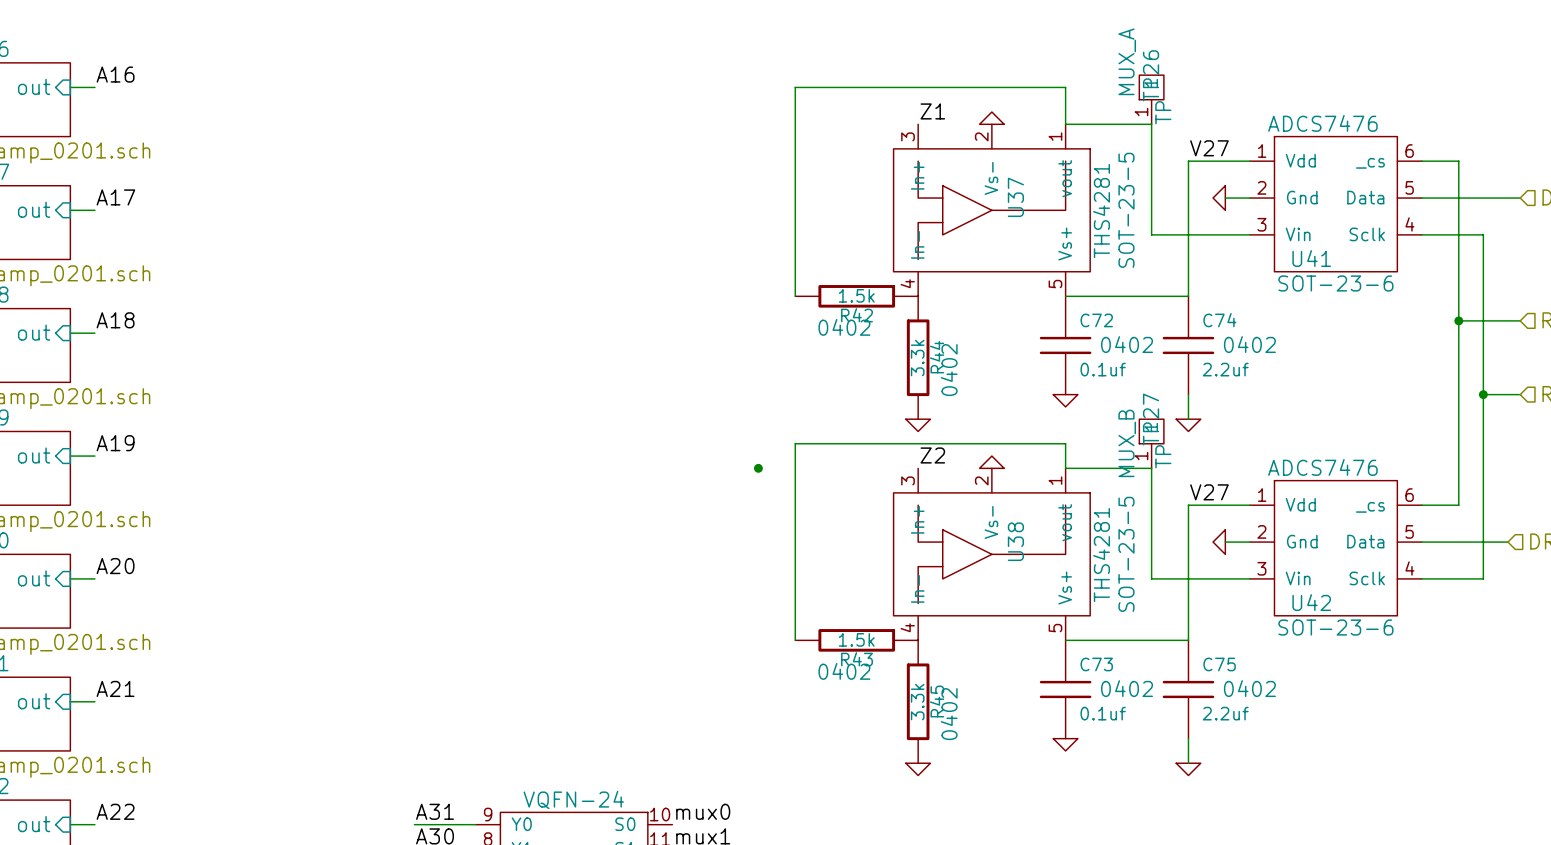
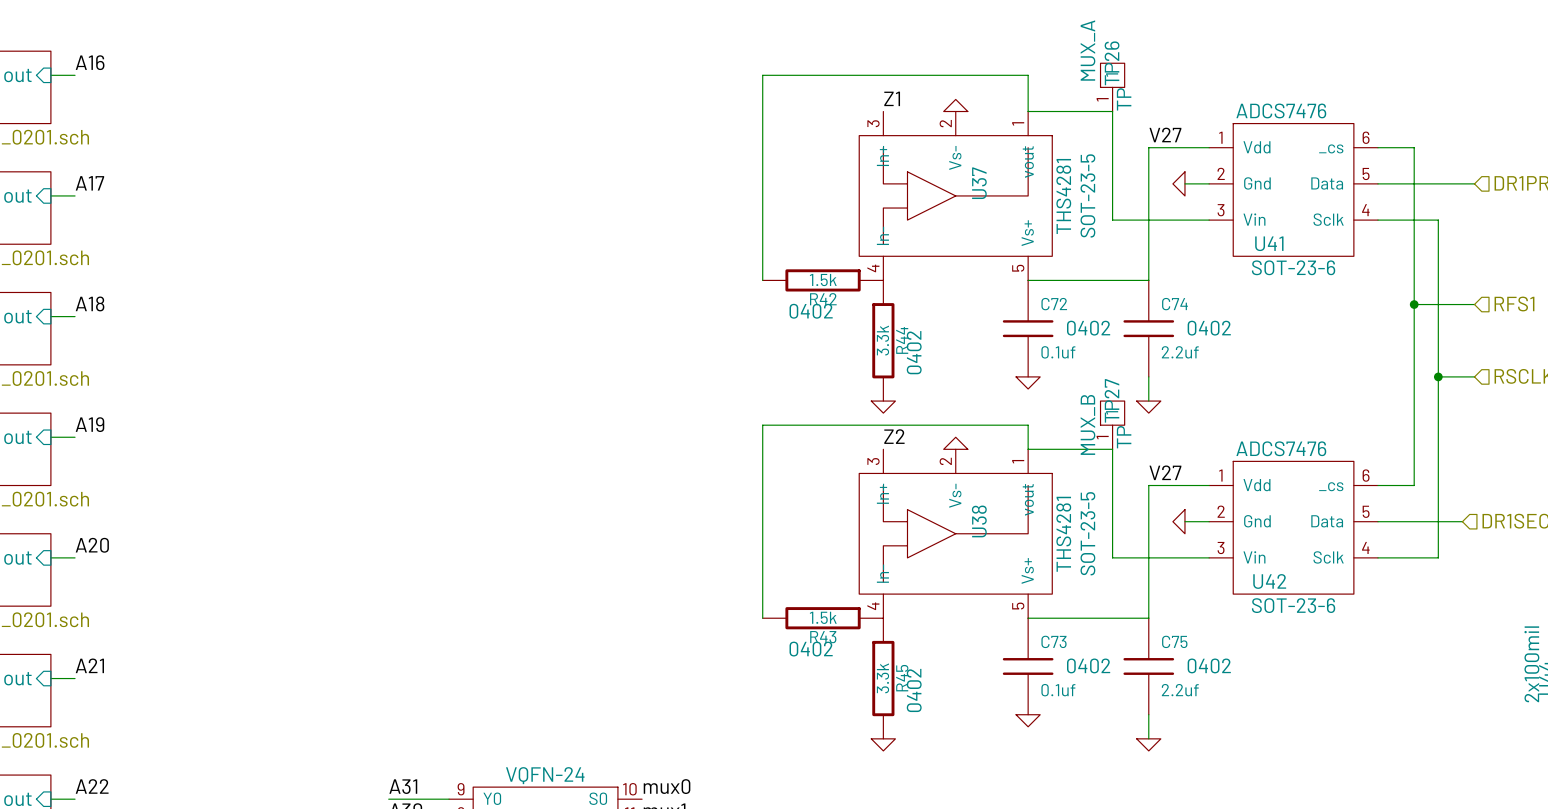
junction: (758, 468) -> none

